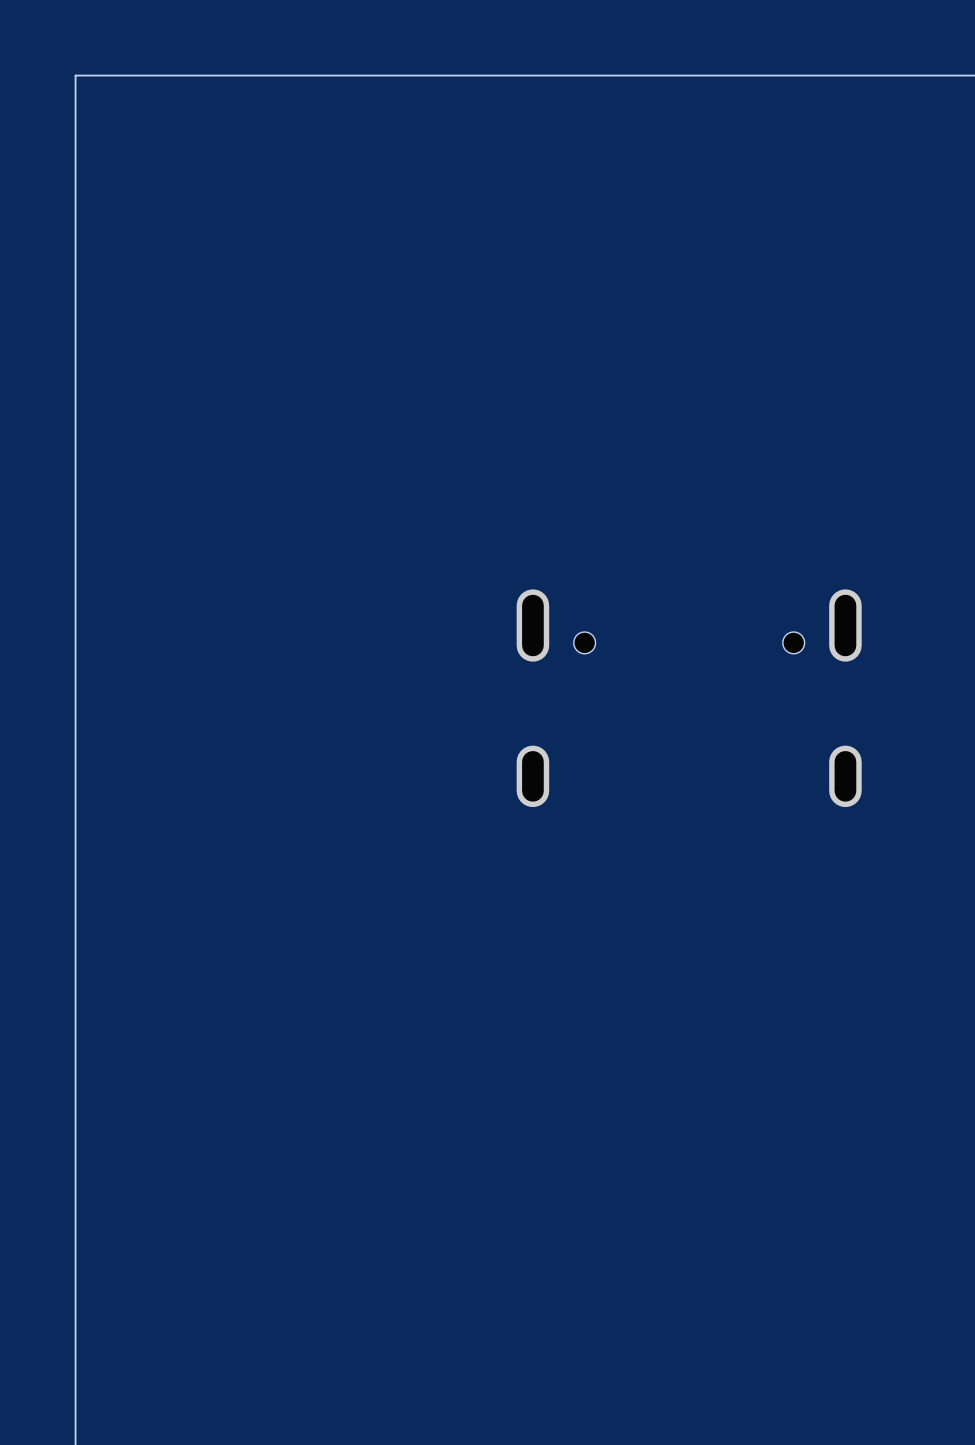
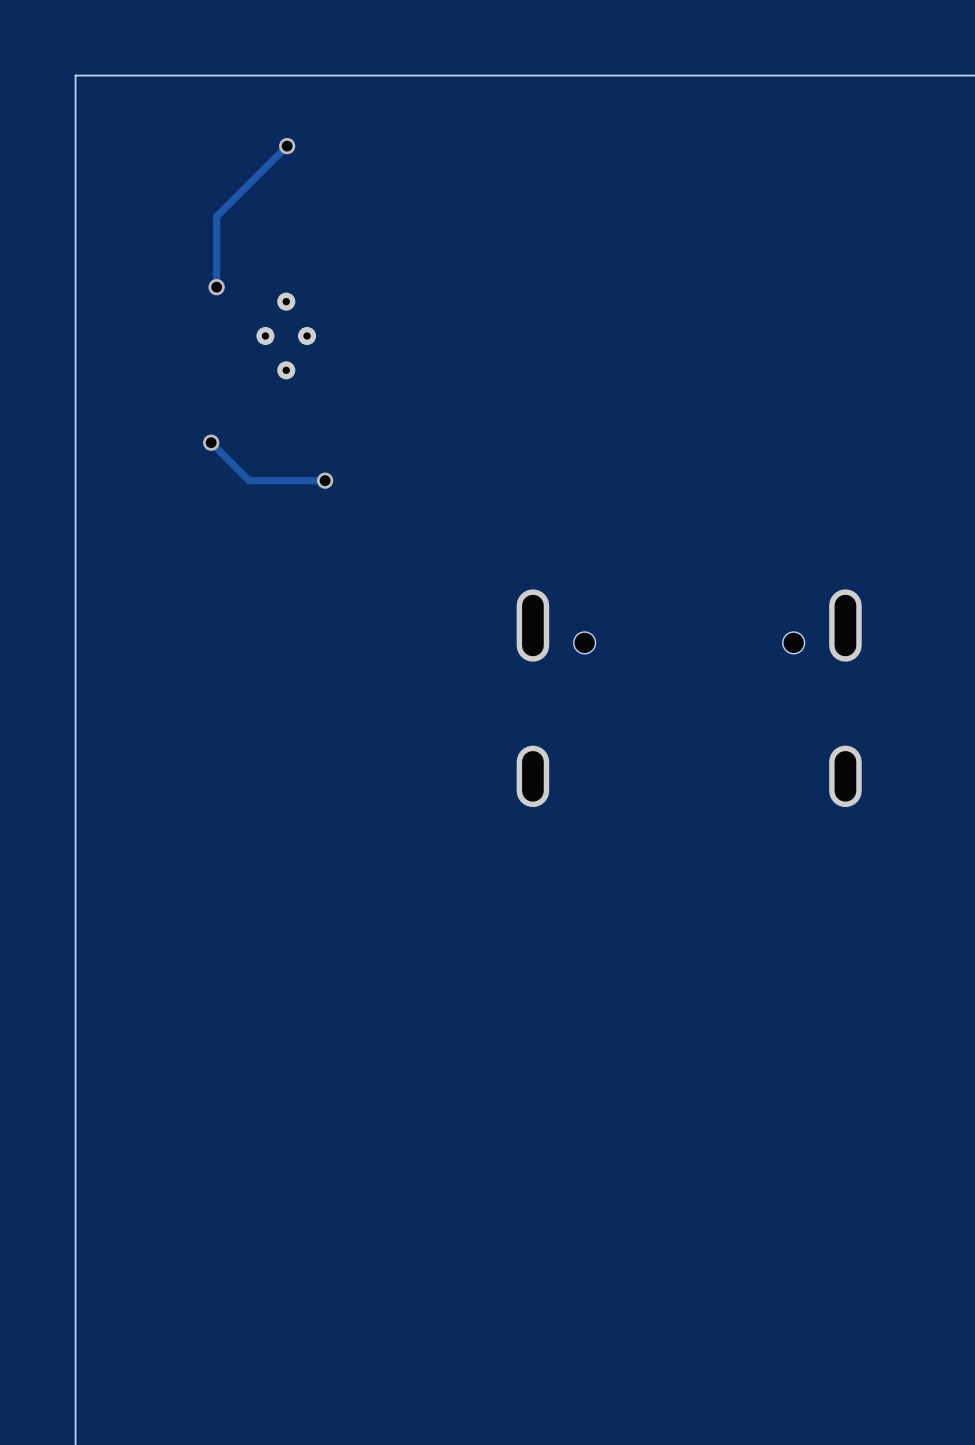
track: none -> (287, 146) (216, 216) (216, 287)
via: none -> (287, 146)
via: none -> (216, 287)
part: none -> (286, 335)
track: none -> (211, 442) (249, 480) (325, 480)
via: none -> (211, 442)
via: none -> (325, 480)

